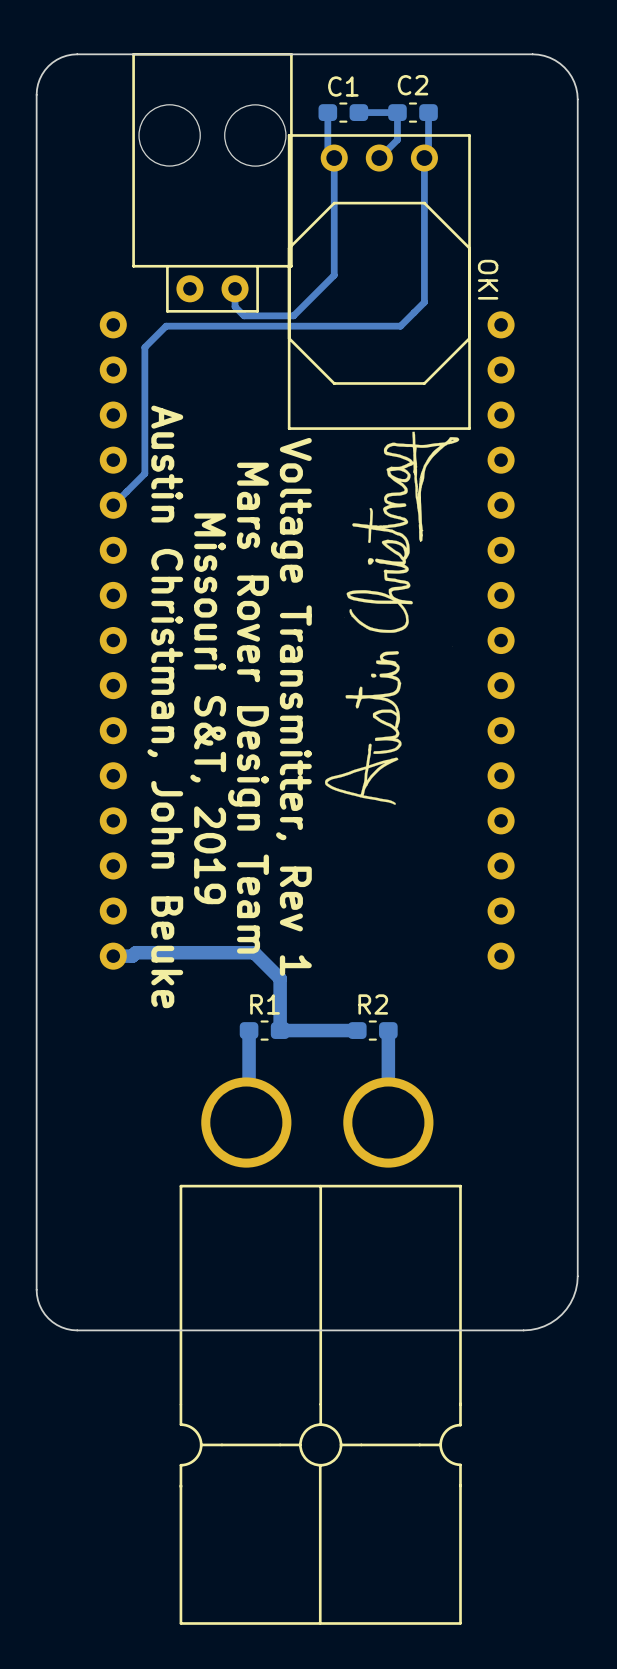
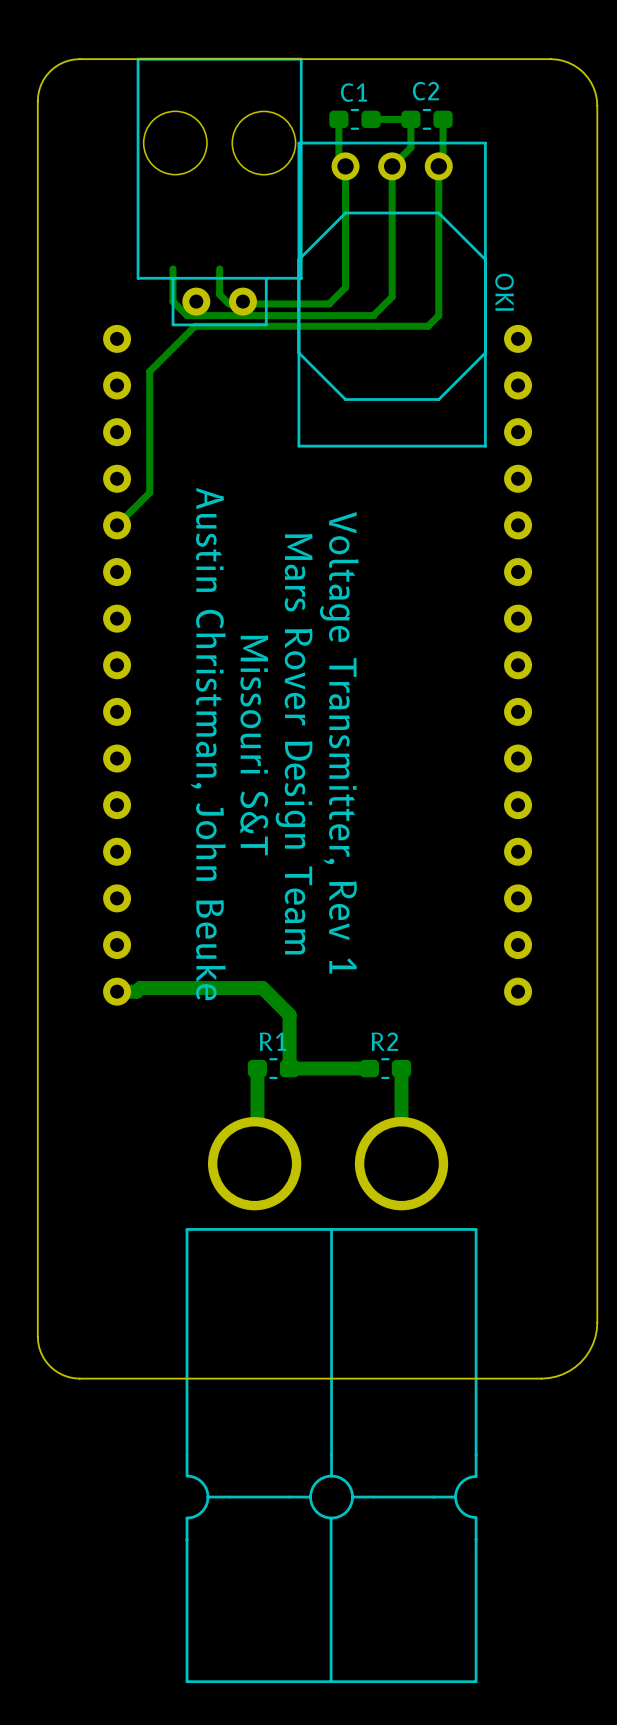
bottom track: none -> (392, 166) (392, 296) (373, 315) (187, 315) (173, 301) (173, 268)
bottom track: (235, 288) (235, 306) (244, 315) (293, 315) (318, 291) -> (219, 268) (219, 294) (228, 303) (329, 303)
bottom track: (414, 312) (400, 326) (166, 326) (144, 347) (144, 356) -> (428, 326) (194, 326) (149, 371)
drawing: [324, 431, 460, 805] -> none
text position: Austin Christman, John Beuke (165, 706) -> Austin Christman, John Beuke (208, 744)
text position: Voltage Transmitter, Rev 1 (291, 706) -> Voltage Transmitter, Rev 1 (339, 742)
text: Missouri S&T, 2019 (208, 708) -> Missouri S&T (254, 745)
text position: Mars Rover Design Team (248, 708) -> Mars Rover Design Team (294, 744)

